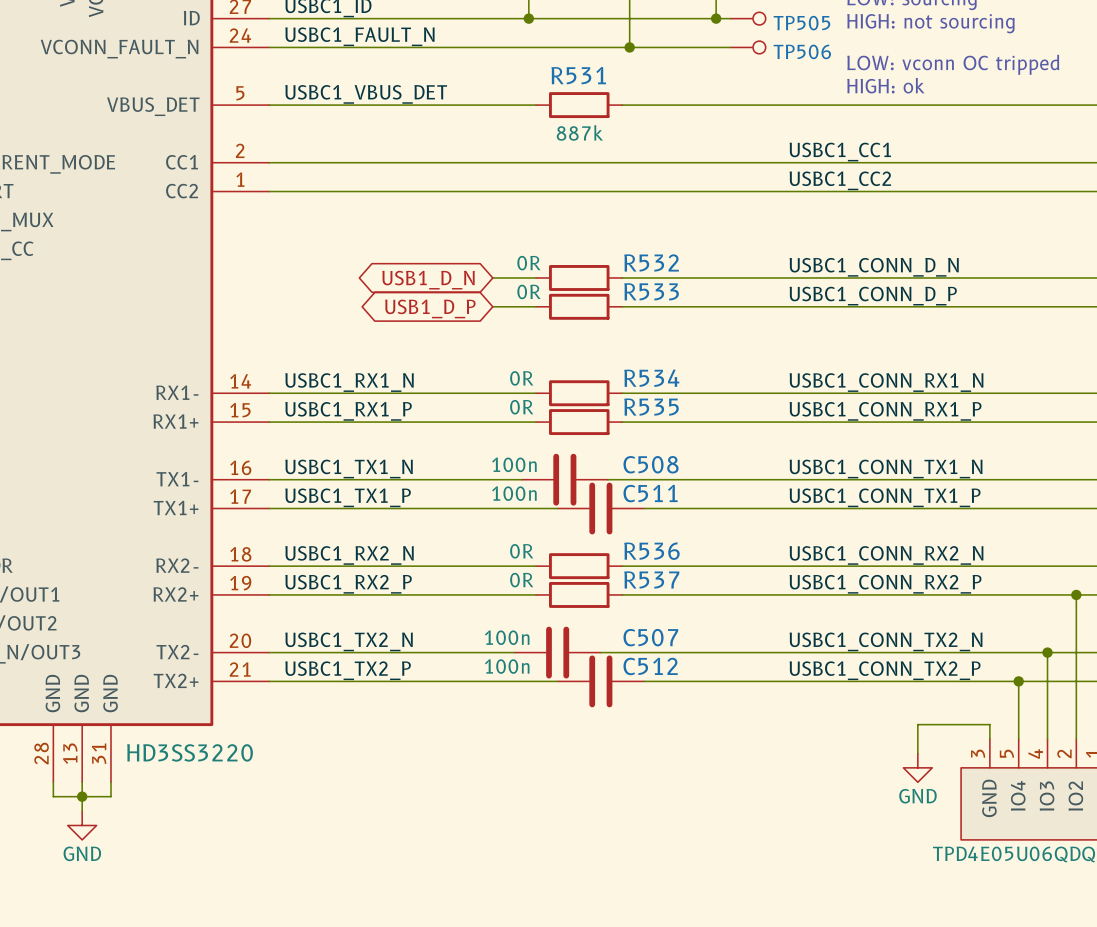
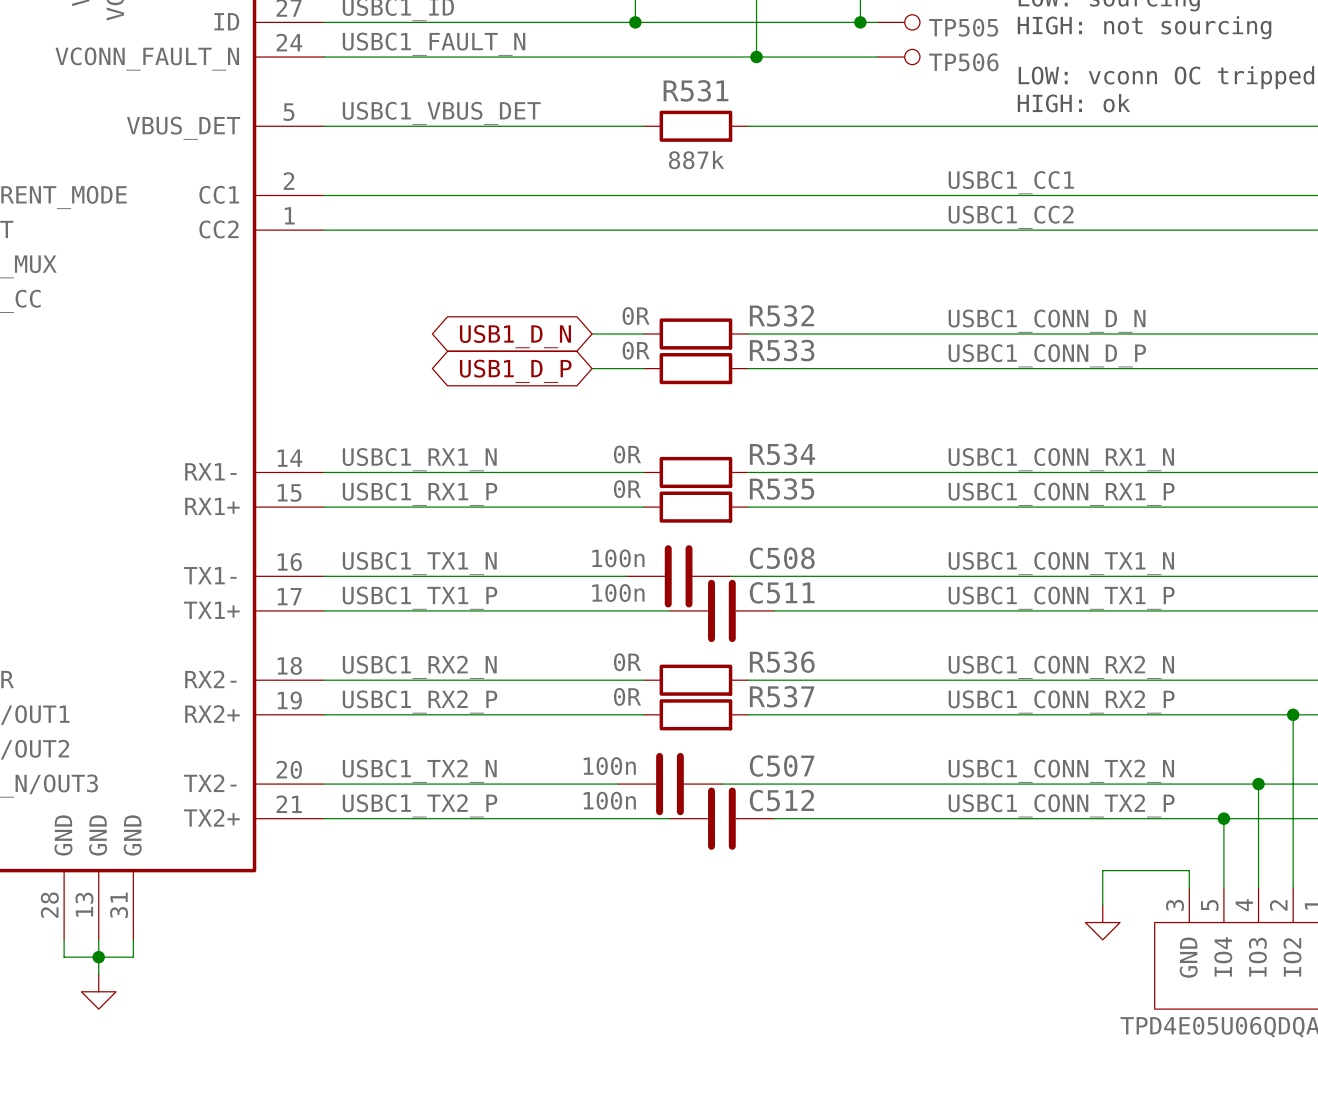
part value: HD3SS3220 (190, 752) -> none
power symbol text: GND (917, 796) -> none
power symbol text: GND (82, 853) -> none

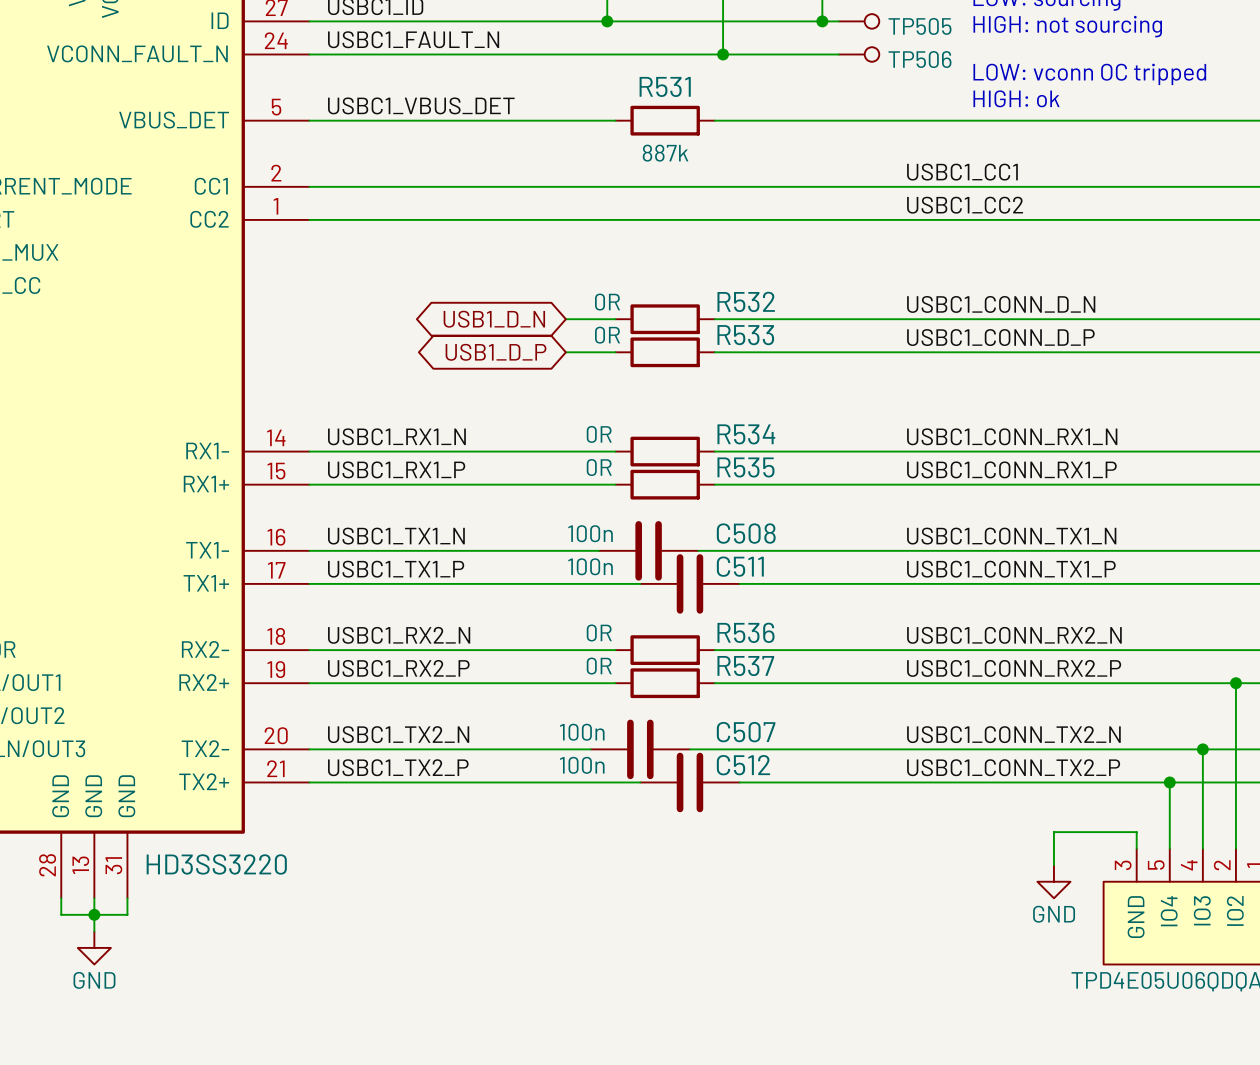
part value: none -> HD3SS3220 (216, 864)
power symbol text: none -> GND (1054, 914)
power symbol text: none -> GND (94, 980)

